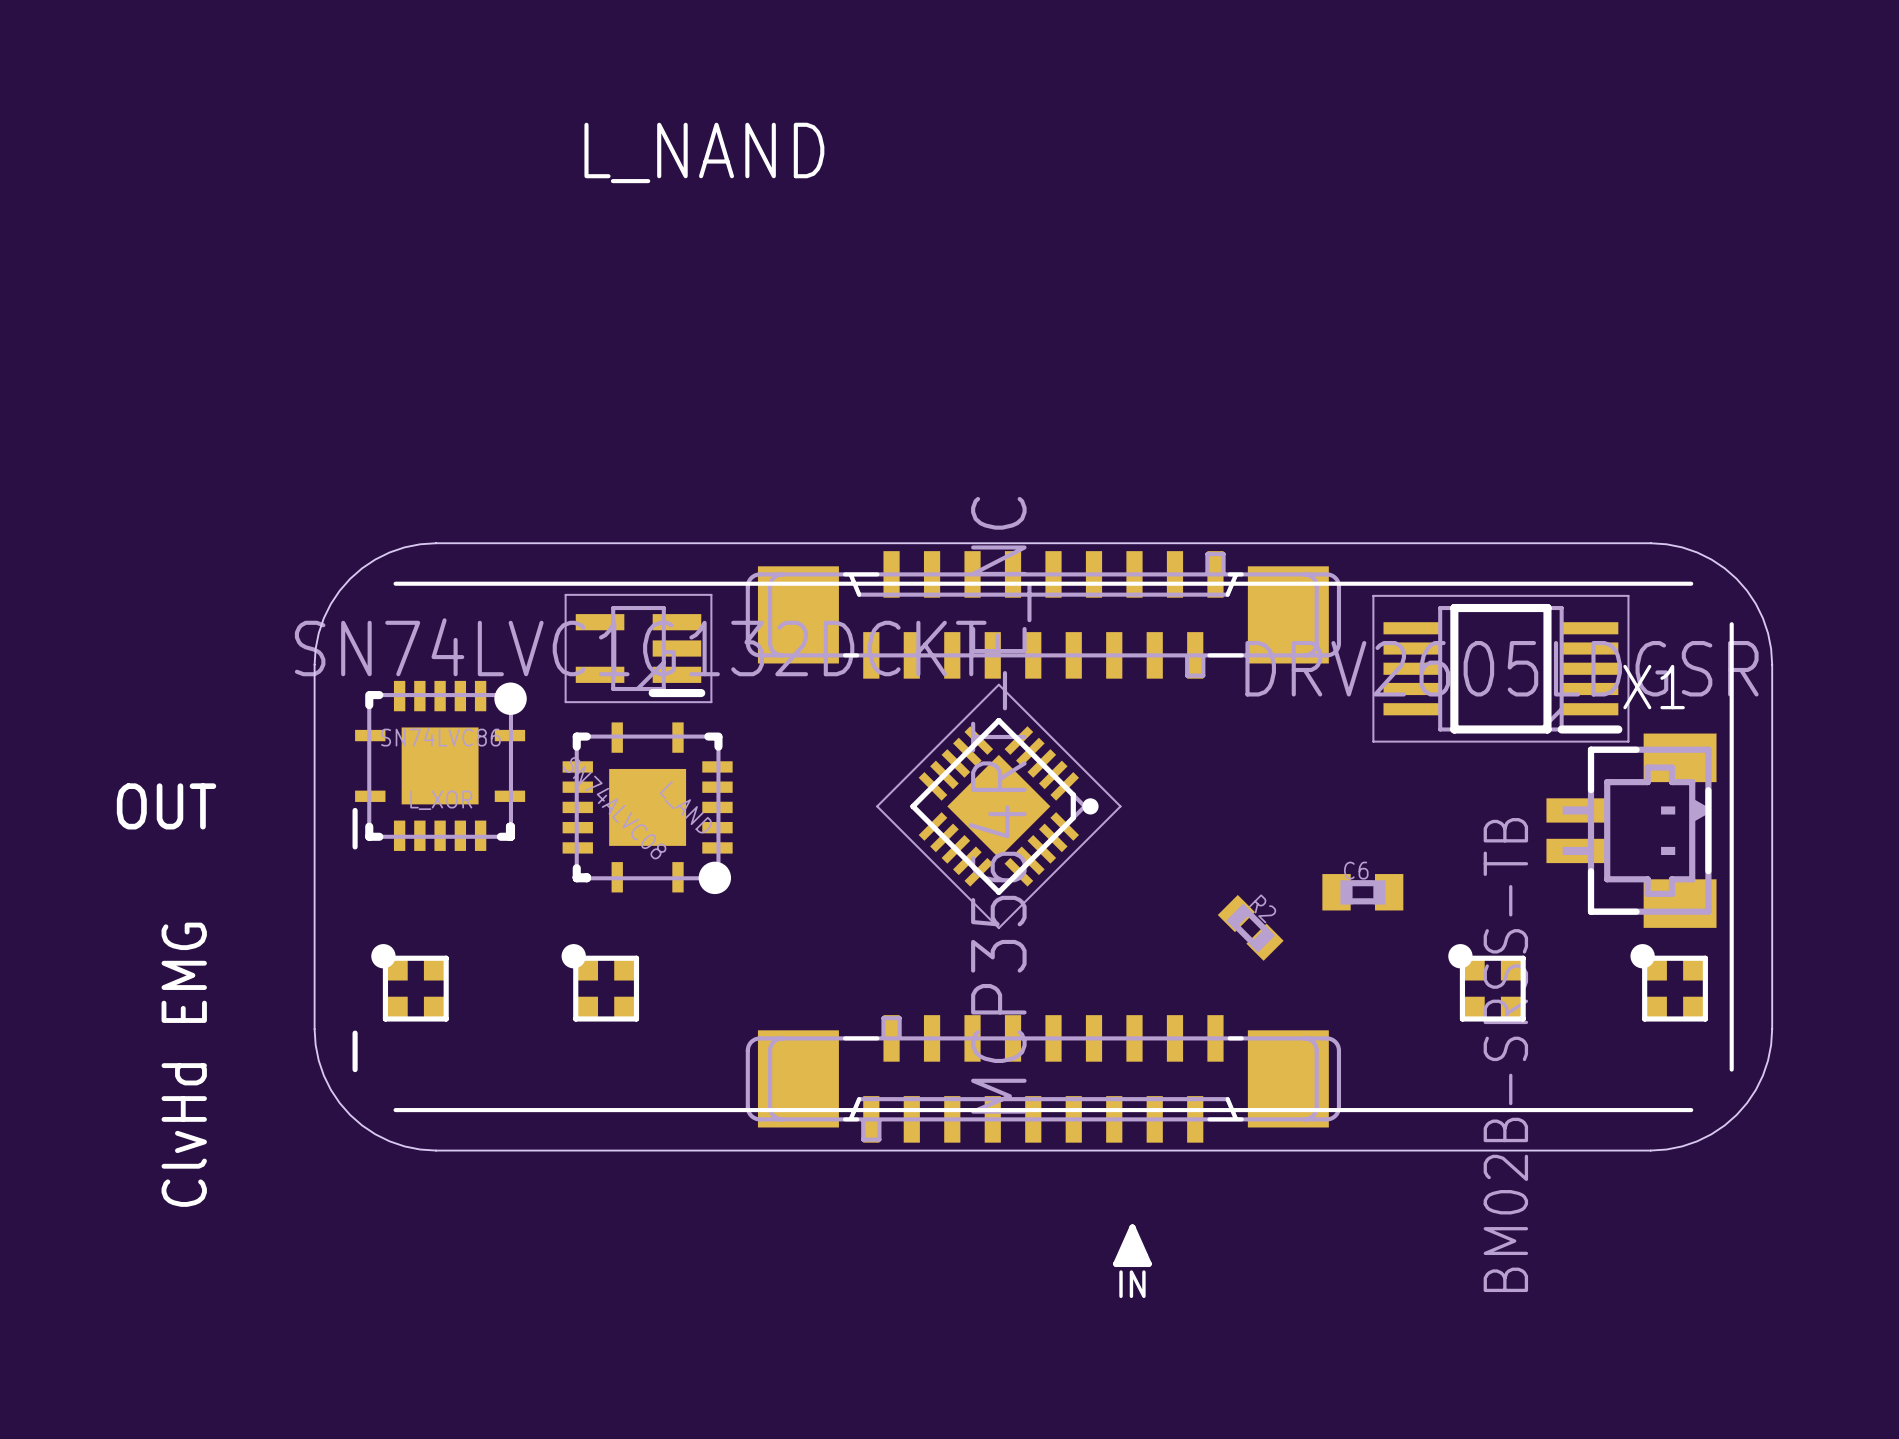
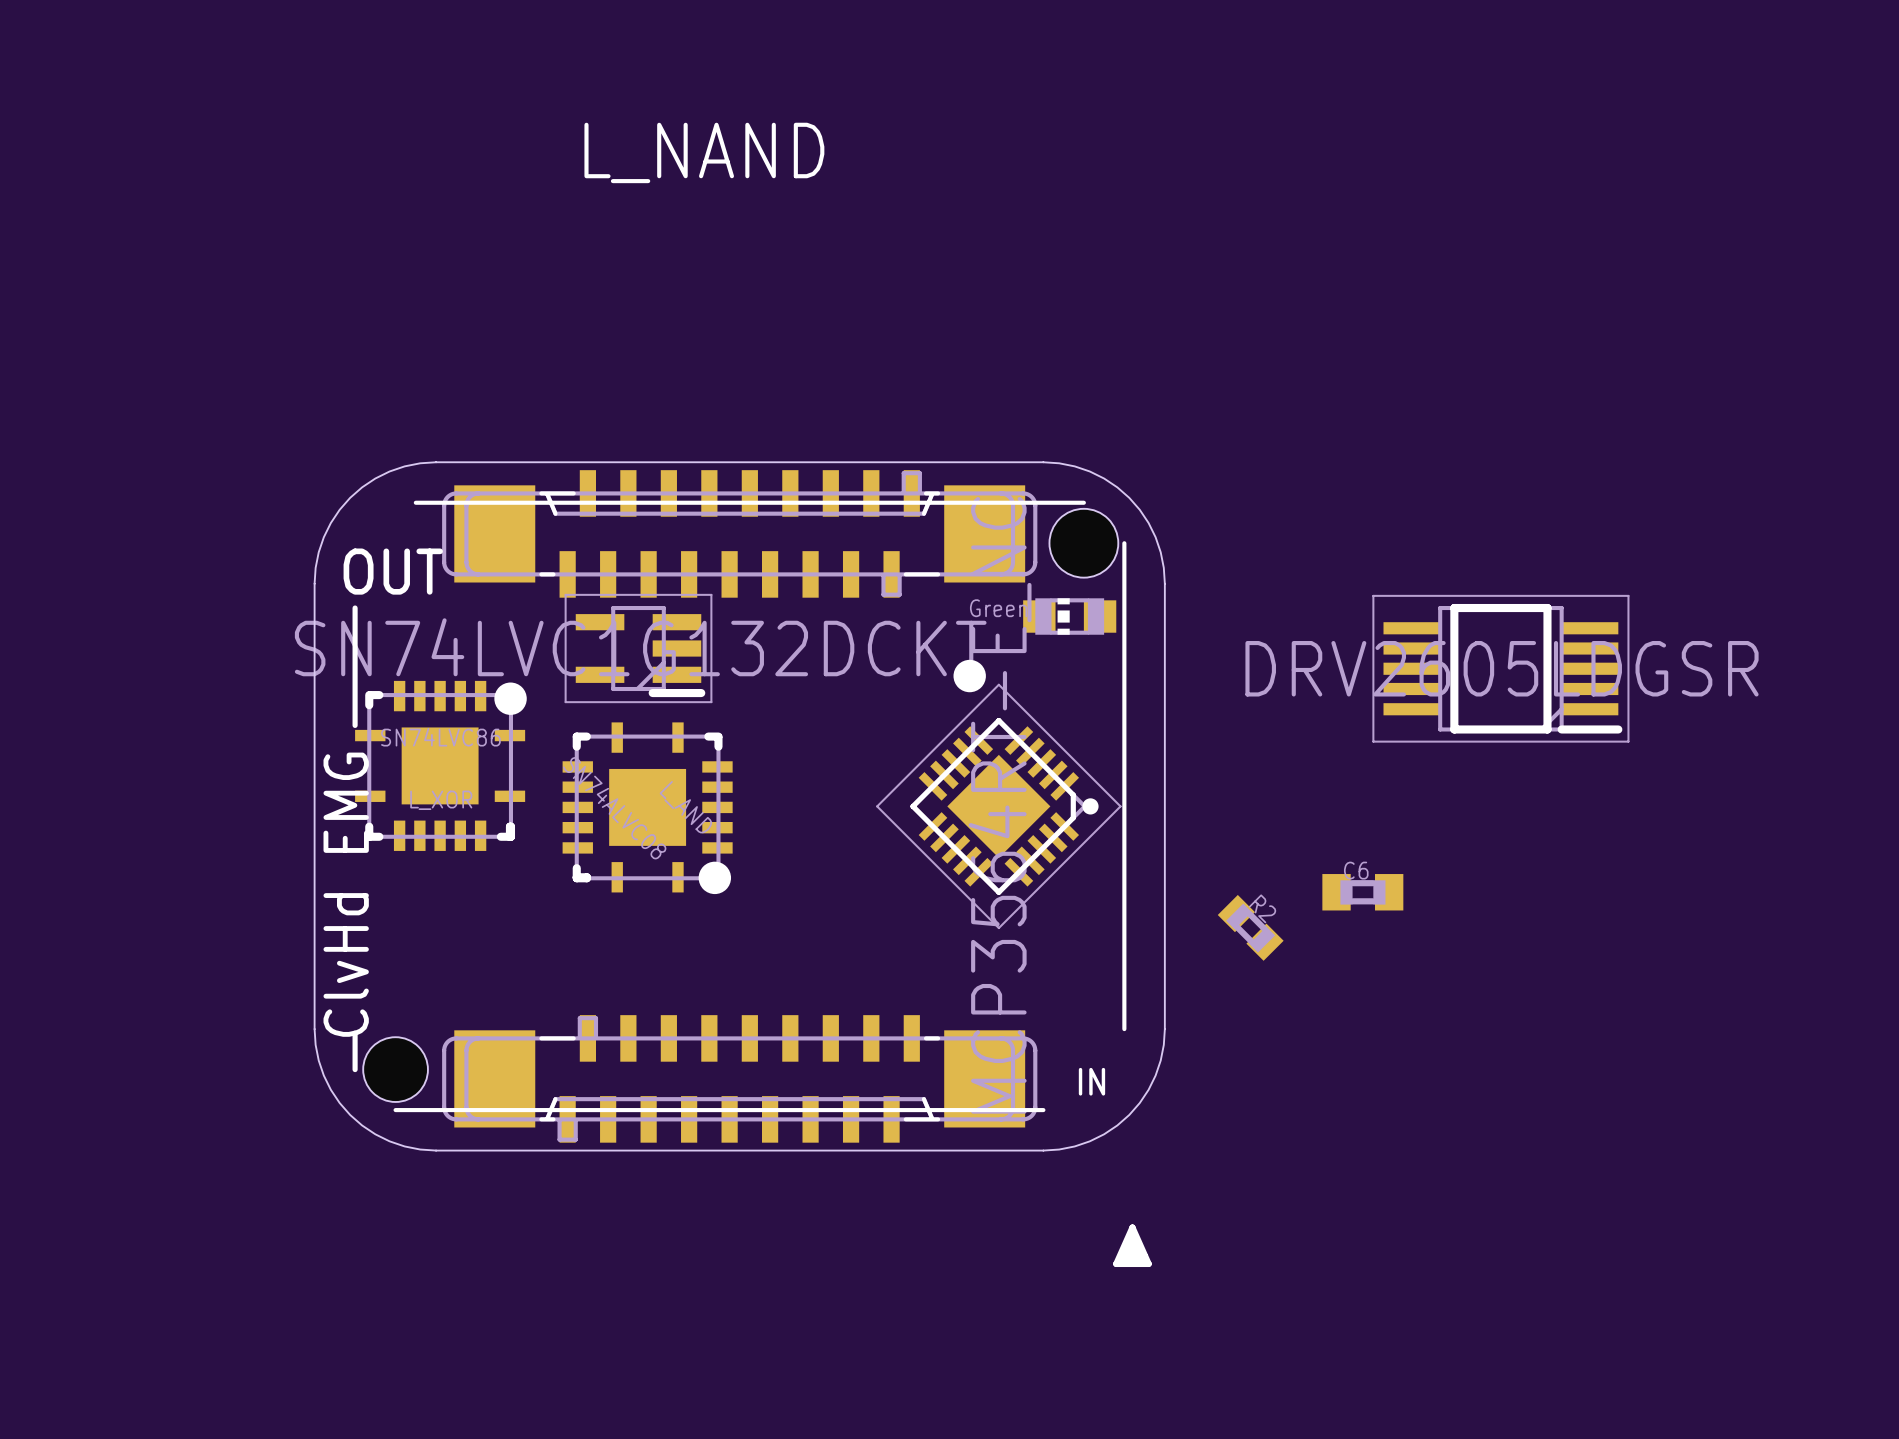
line: none -> (415, 502) (1083, 502)
part: none -> (739, 533)
hole: none -> (1083, 543)
line: none -> (1124, 543) (1124, 1029)
part footprint: [745, 551, 1342, 679] -> [1023, 598, 1117, 635]
line: (395, 583) (1691, 583) -> none
line: none -> (355, 608) (355, 725)
part value: none -> Green (998, 608)
line: (1731, 624) (1731, 1069) -> none
drawing: none -> [953, 659, 986, 693]
board edge: (314, 664) (318, 633) (323, 618) (339, 590) (350, 578) (362, 568) (389, 552) (404, 547) (436, 543) (1650, 543) (1682, 547) (1711, 559) (1724, 568) (1747, 590) (1755, 603) (1768, 633) (1772, 664) (1772, 1029) (1768, 1060) (1755, 1089) (1747, 1103) (1724, 1125) (1711, 1134) (1682, 1146) (1650, 1150) (1043, 1150) -> (314, 664) (315, 567) (323, 537) (339, 509) (362, 487) (375, 478) (404, 466) (436, 462) (1043, 462) (1074, 466) (1104, 478) (1117, 487) (1139, 509) (1155, 537) (1163, 567) (1163, 1044) (1160, 1060) (1148, 1089) (1139, 1103) (1117, 1125) (1104, 1134) (1074, 1146) (1043, 1150)
text position: OUT (166, 806) -> OUT (393, 571)
line: (355, 810) (355, 846) -> none
X1: BM02B-SRSS-TB (1631, 830) -> none
part: (410, 982) -> none
part: (600, 982) -> none
part: (1487, 982) -> none
part: (1669, 982) -> none
text position: ClvHd EMG (184, 1064) -> ClvHd EMG (346, 894)
hole: none -> (395, 1069)
part position: (1043, 1078) -> (739, 1078)
line: (1043, 1110) (1691, 1110) -> none
text position: IN (1132, 1284) -> IN (1091, 1081)

